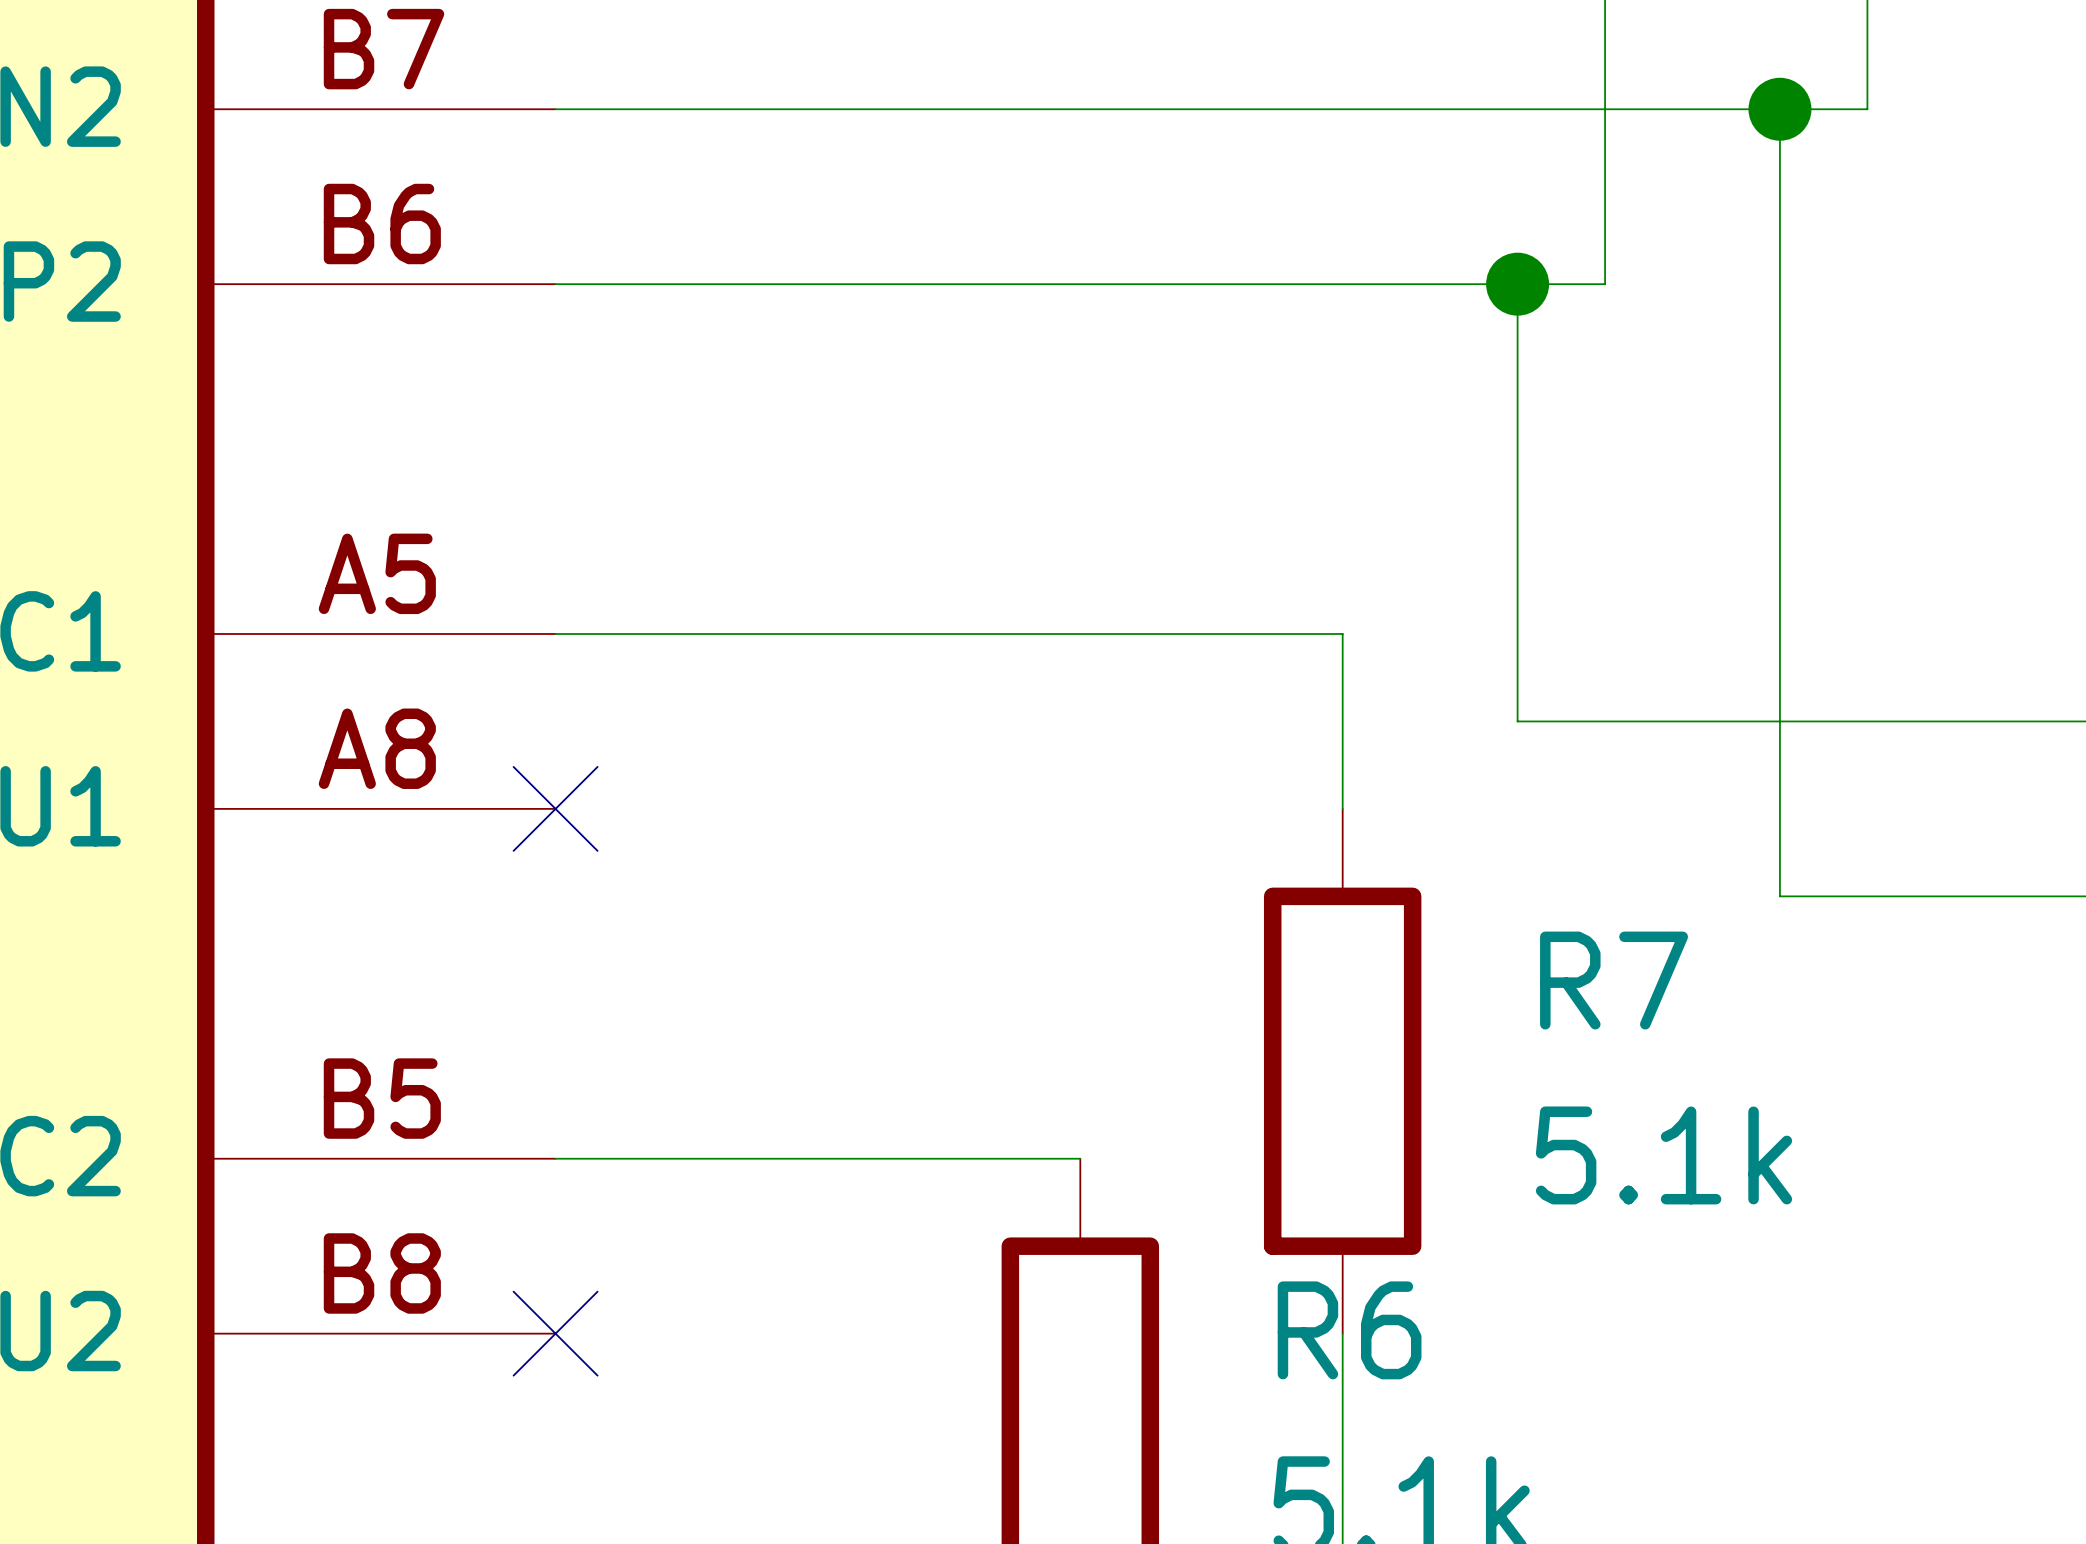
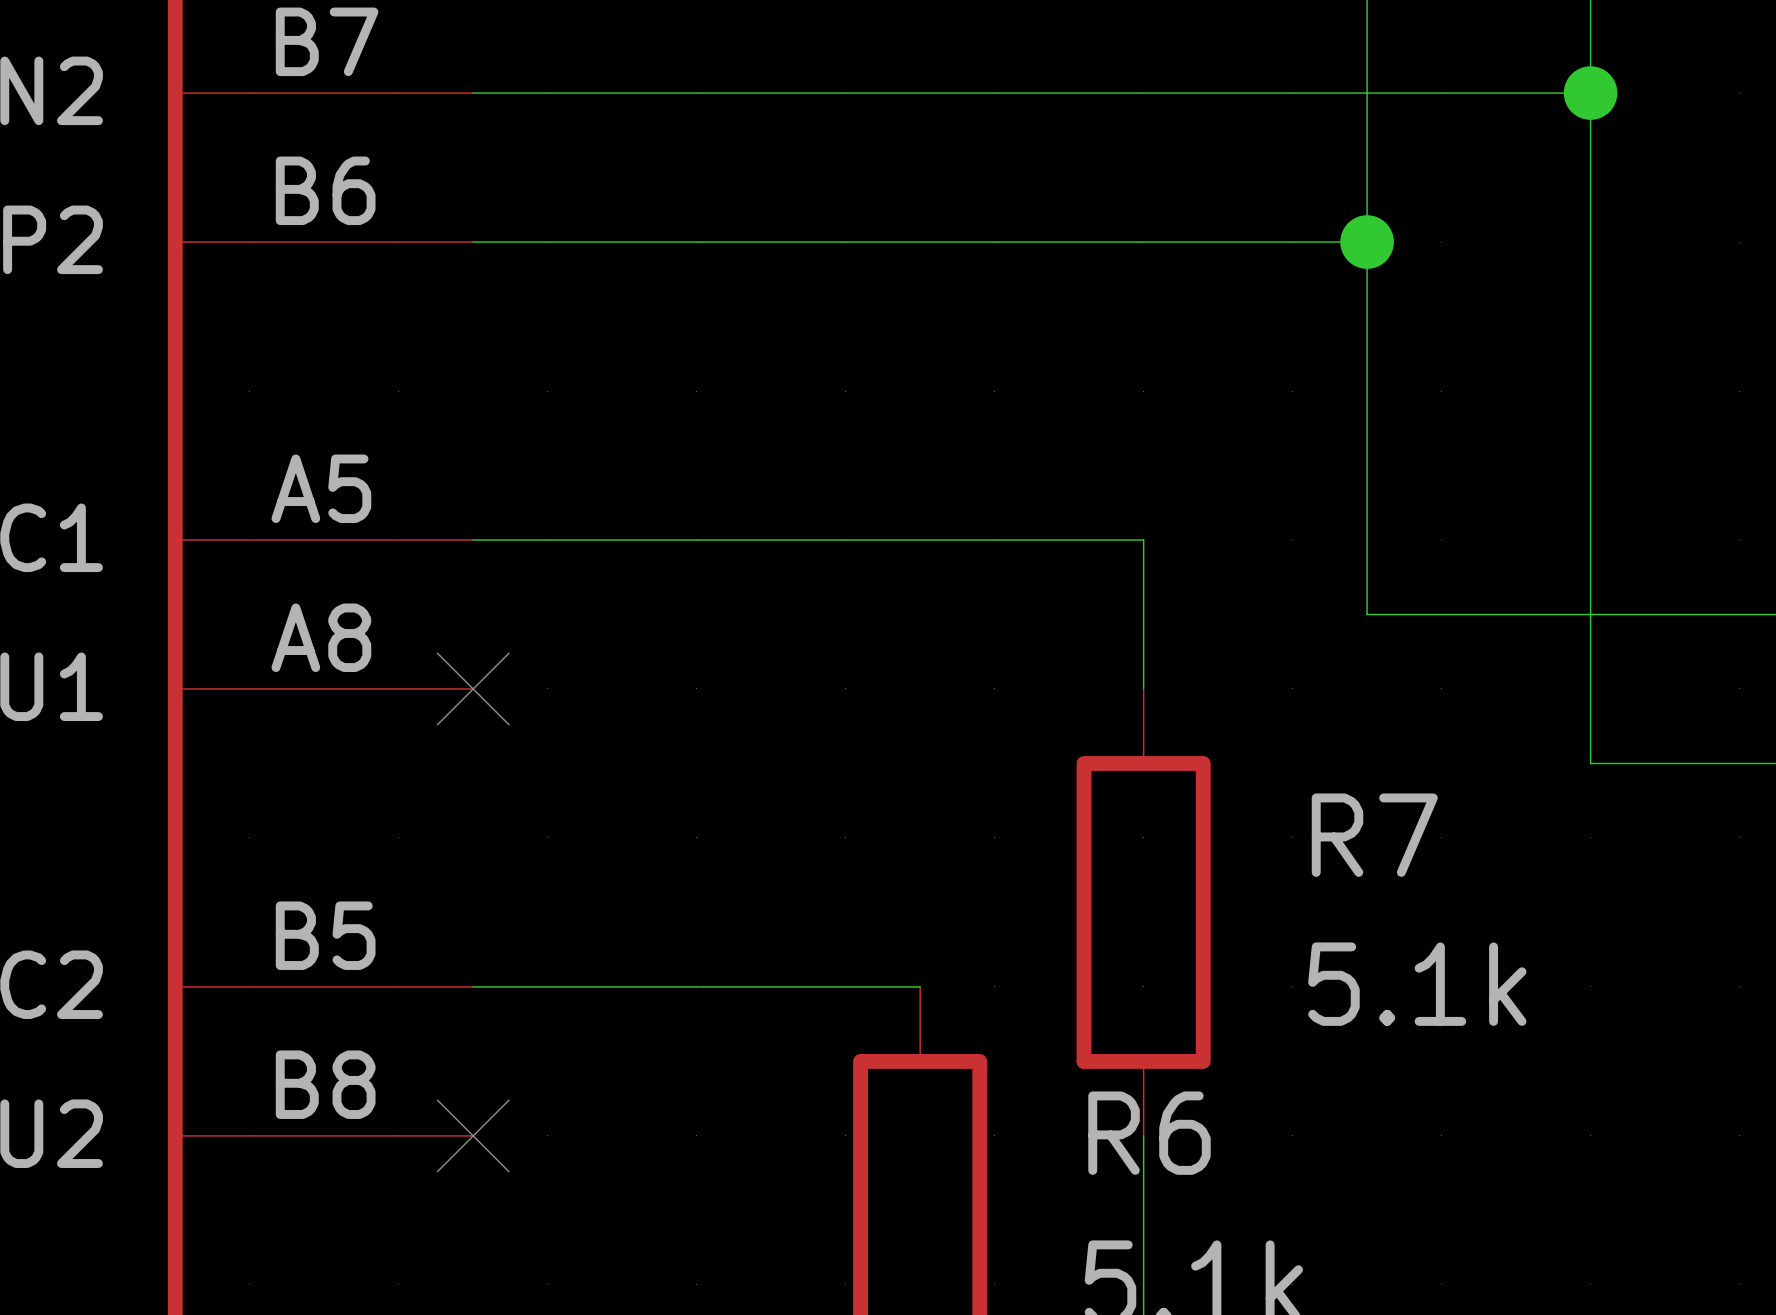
wire: (1779, 109) (1779, 896) (1867, 896) -> (1590, 93) (1590, 763)
junction position: (1779, 109) -> (1590, 93)
wire: (1517, 284) (1517, 721) (1605, 721) -> (1367, 242) (1367, 614)
junction position: (1517, 284) -> (1367, 242)

